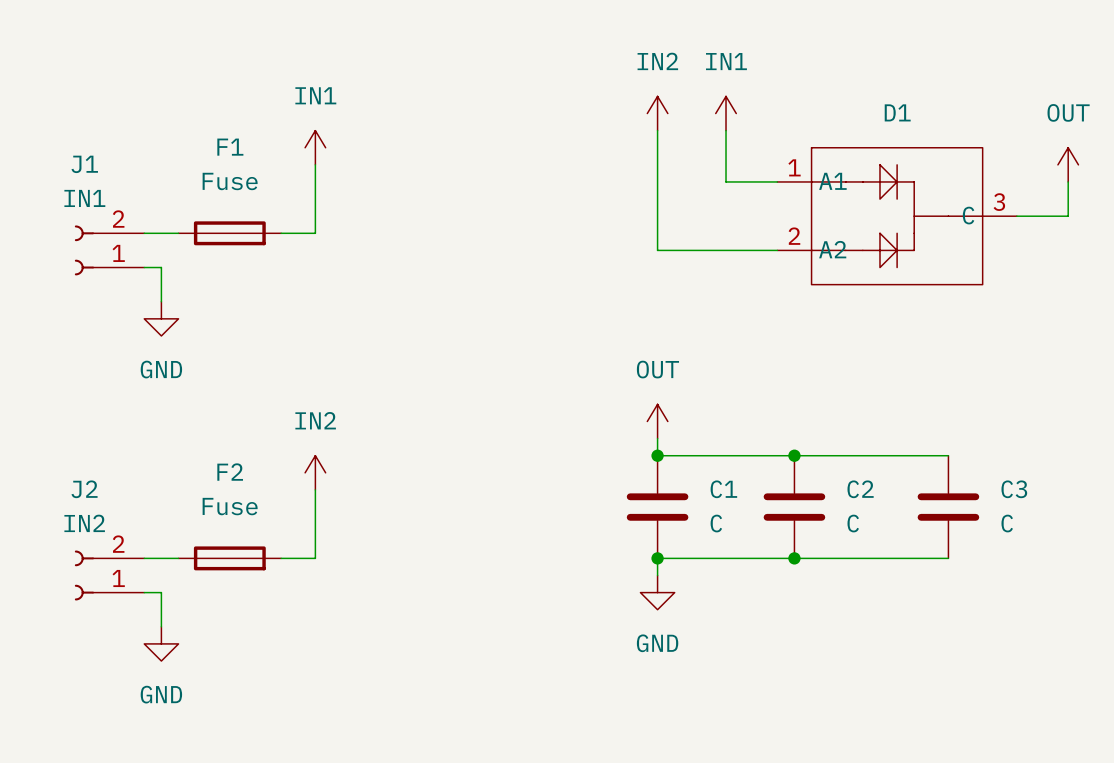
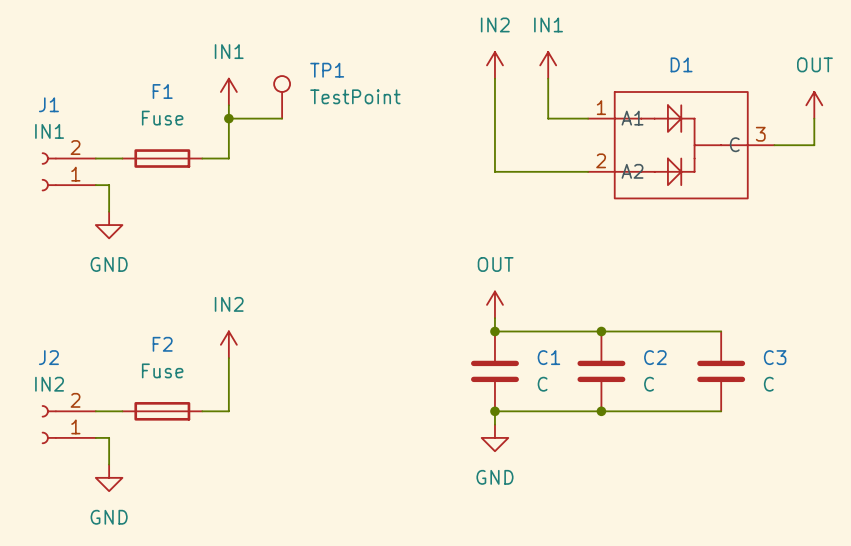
TP1: none -> TestPoint (282, 97)
wire: none -> (228, 118) (282, 118)
junction: none -> (228, 118)

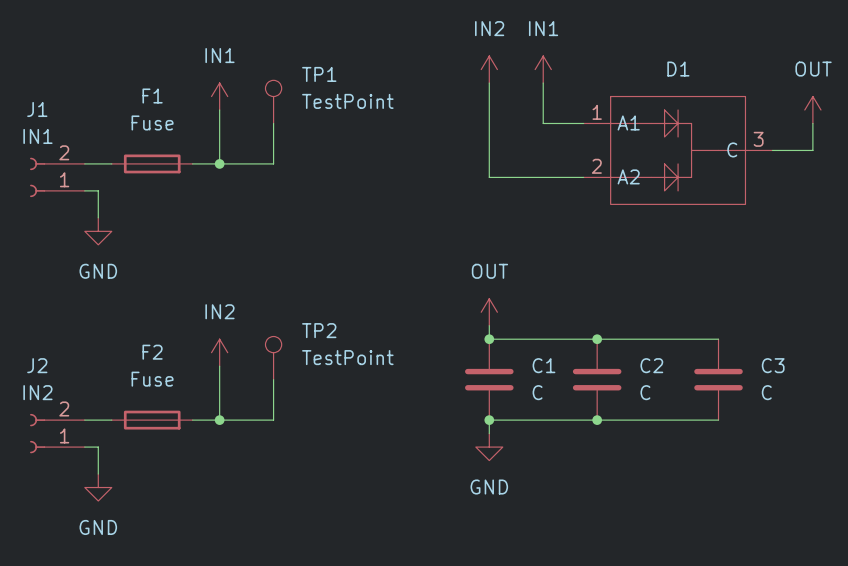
wire: (228, 118) (282, 118) -> (219, 163) (273, 163) (273, 123)
junction position: (228, 118) -> (219, 163)
TP2: none -> TestPoint (273, 358)
wire: none -> (273, 379) (273, 420) (219, 420)
junction: none -> (219, 420)

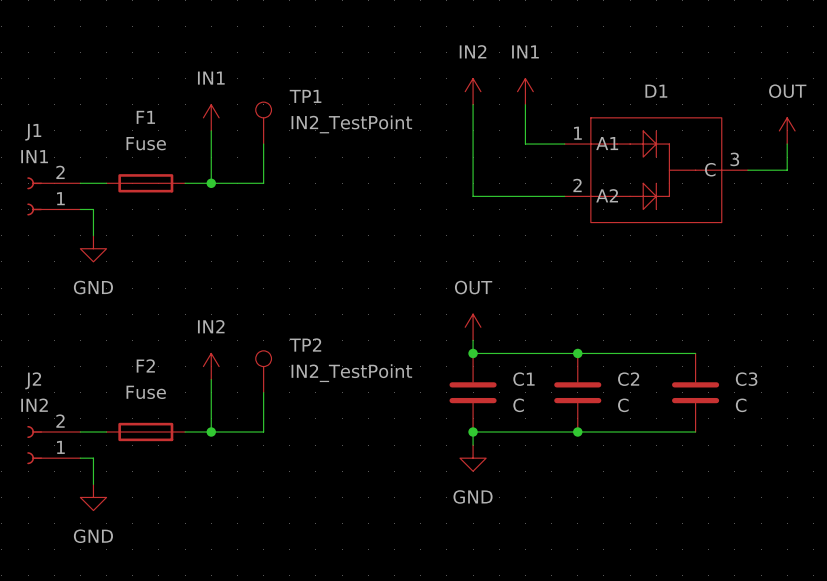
TP1 value: TestPoint (347, 101) -> IN2_TestPoint (351, 124)
TP2 value: TestPoint (347, 357) -> IN2_TestPoint (351, 373)

